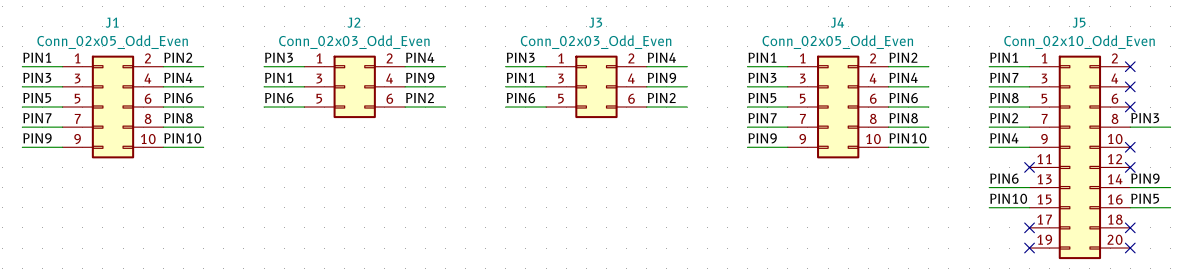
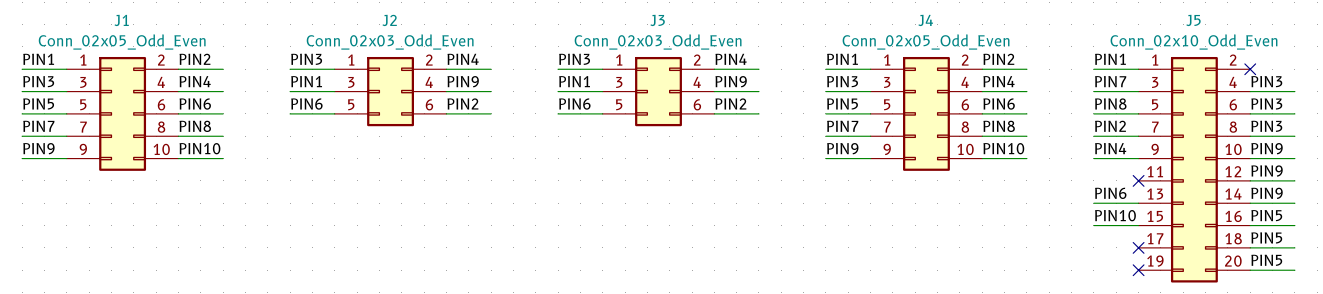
label: none -> PIN3 (1266, 81)
wire: none -> (1250, 91) (1294, 91)
no-connect mark: (1130, 86) -> none
label: none -> PIN3 (1266, 103)
wire: none -> (1250, 113) (1294, 113)
no-connect mark: (1130, 107) -> none
label: none -> PIN9 (1267, 148)
wire: none -> (1250, 158) (1294, 158)
no-connect mark: (1130, 147) -> none
label: none -> PIN9 (1267, 171)
wire: none -> (1250, 180) (1294, 180)
no-connect mark: (1130, 167) -> none
label: none -> PIN5 (1266, 237)
wire: none -> (1250, 247) (1294, 247)
no-connect mark: (1130, 227) -> none
label: none -> PIN5 (1266, 260)
wire: none -> (1250, 270) (1294, 270)
no-connect mark: (1130, 248) -> none

